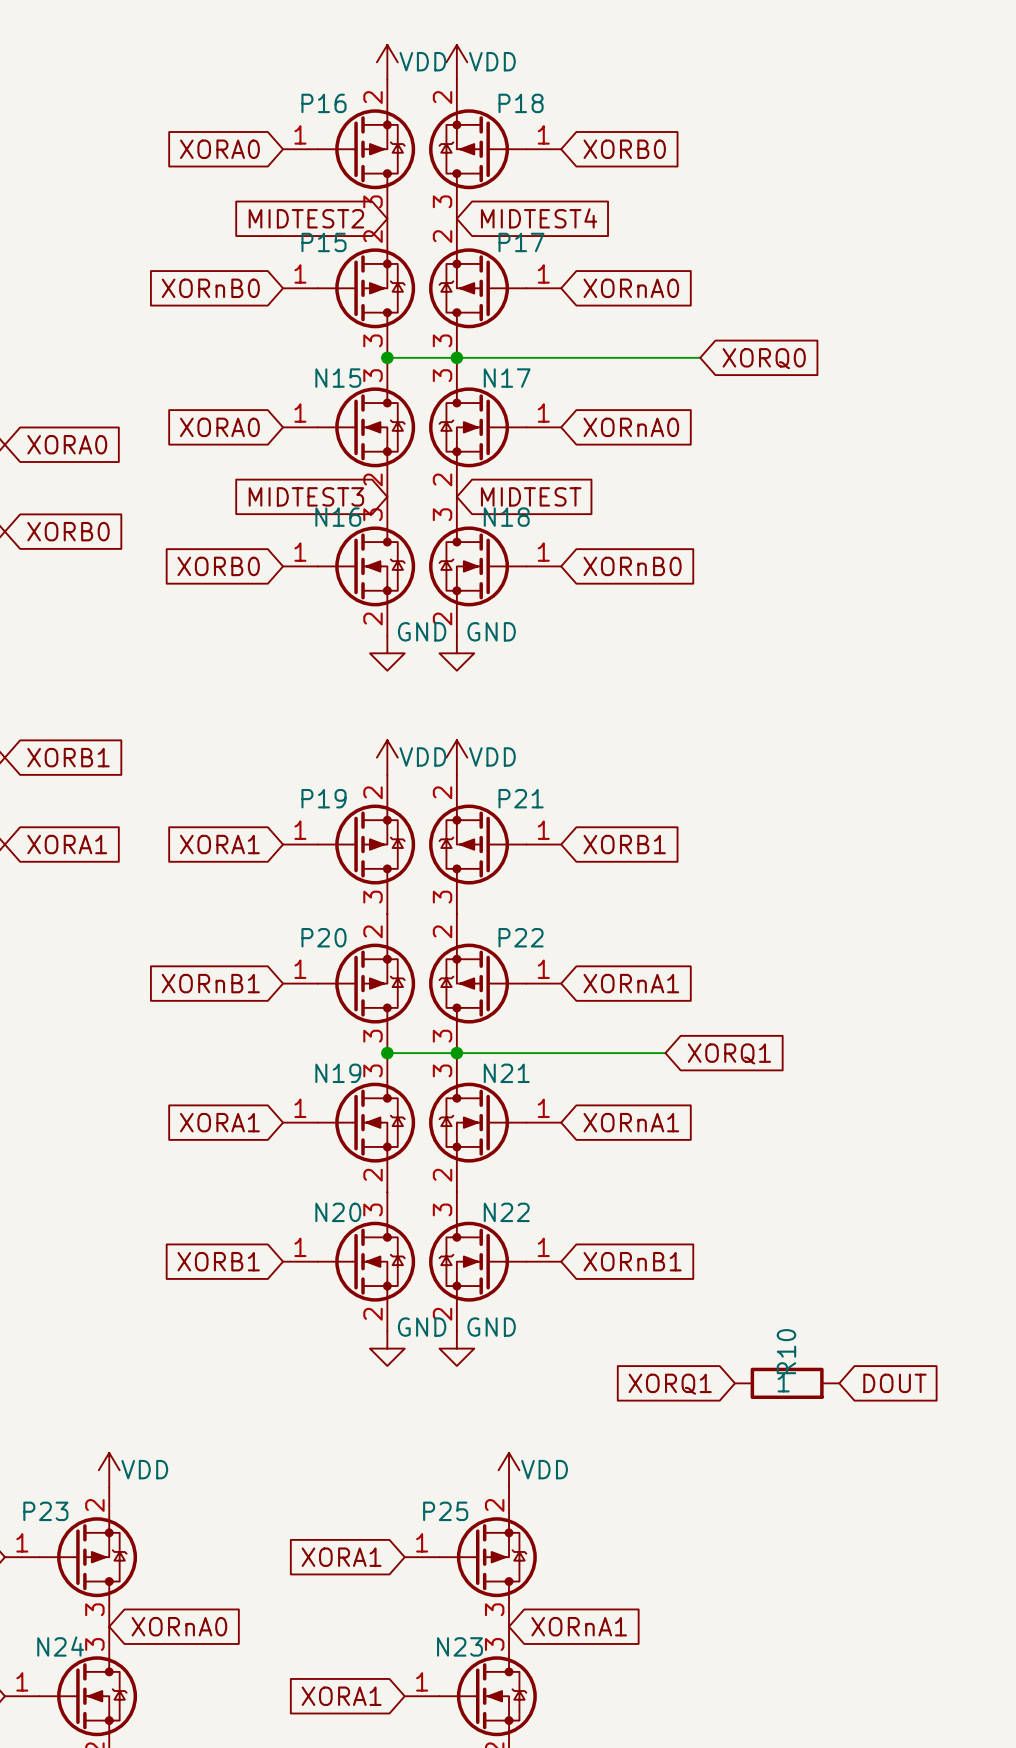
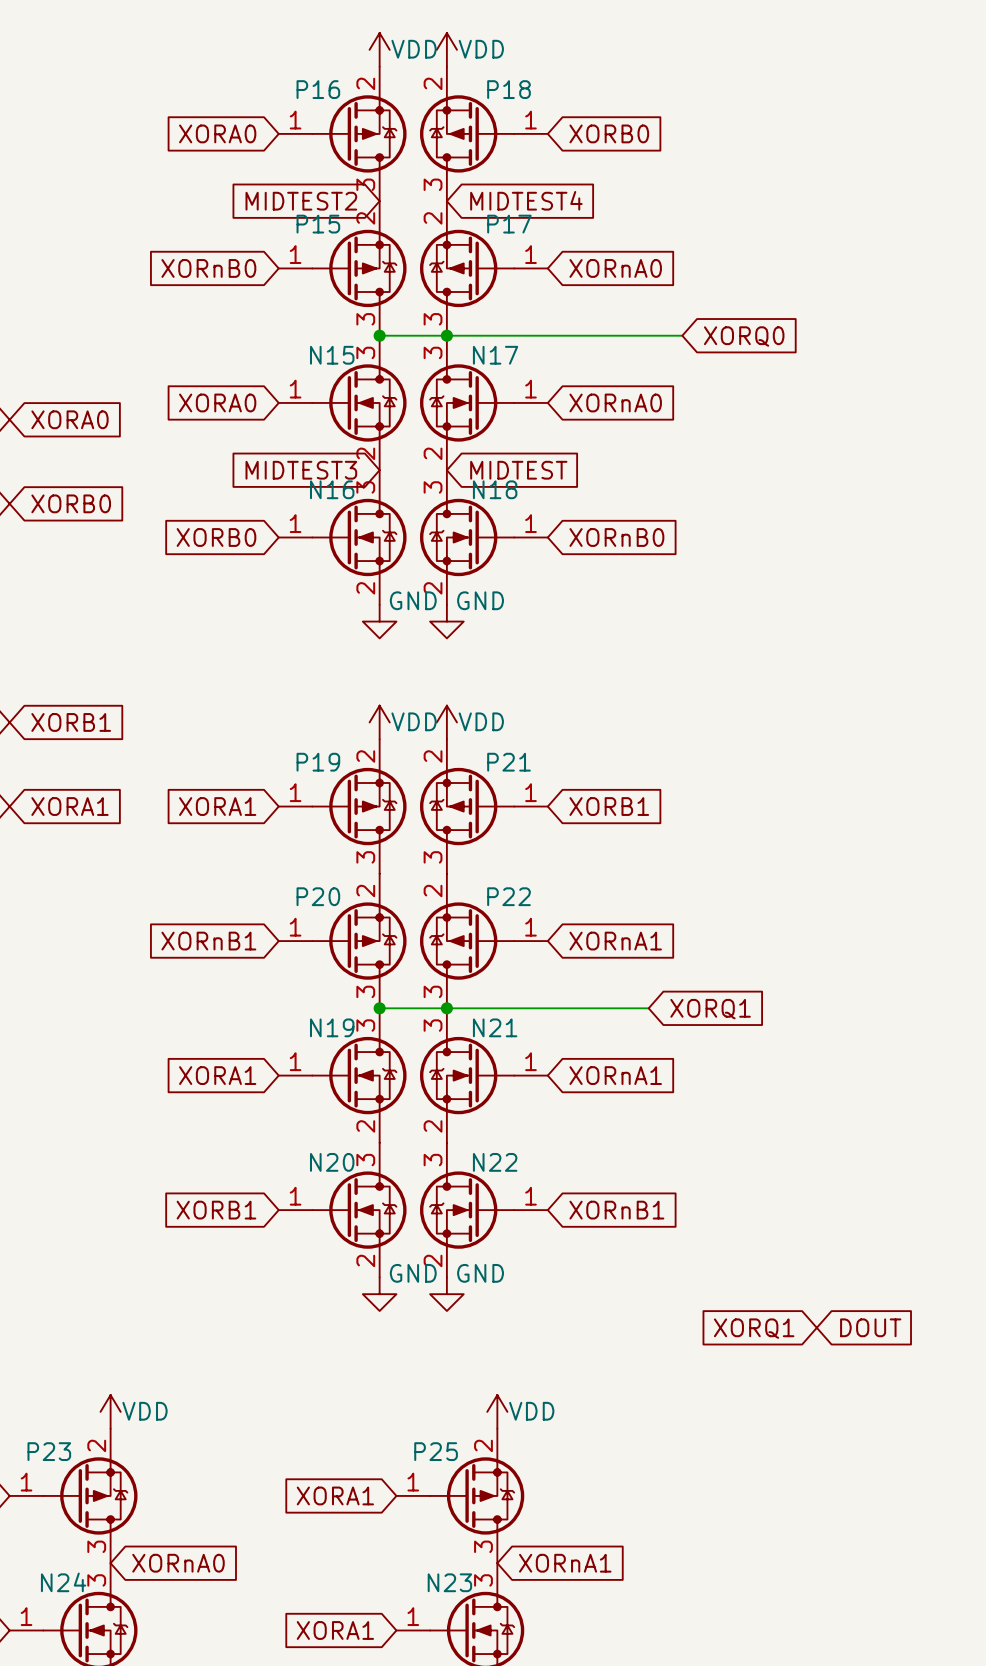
R10: 1 (787, 1383) -> none
global label position: XORQ1 (670, 1384) -> XORQ1 (754, 1328)

